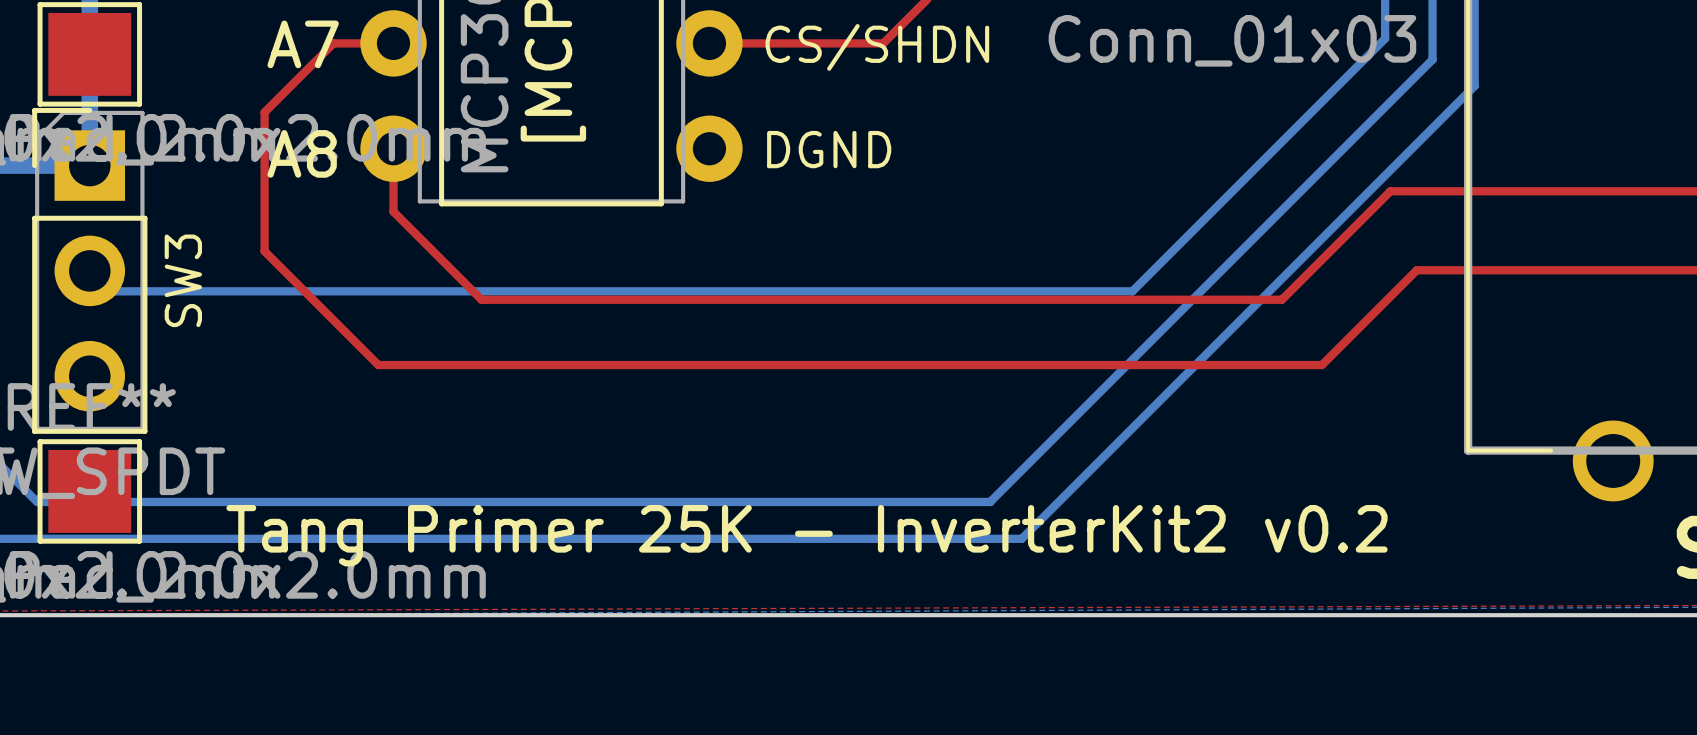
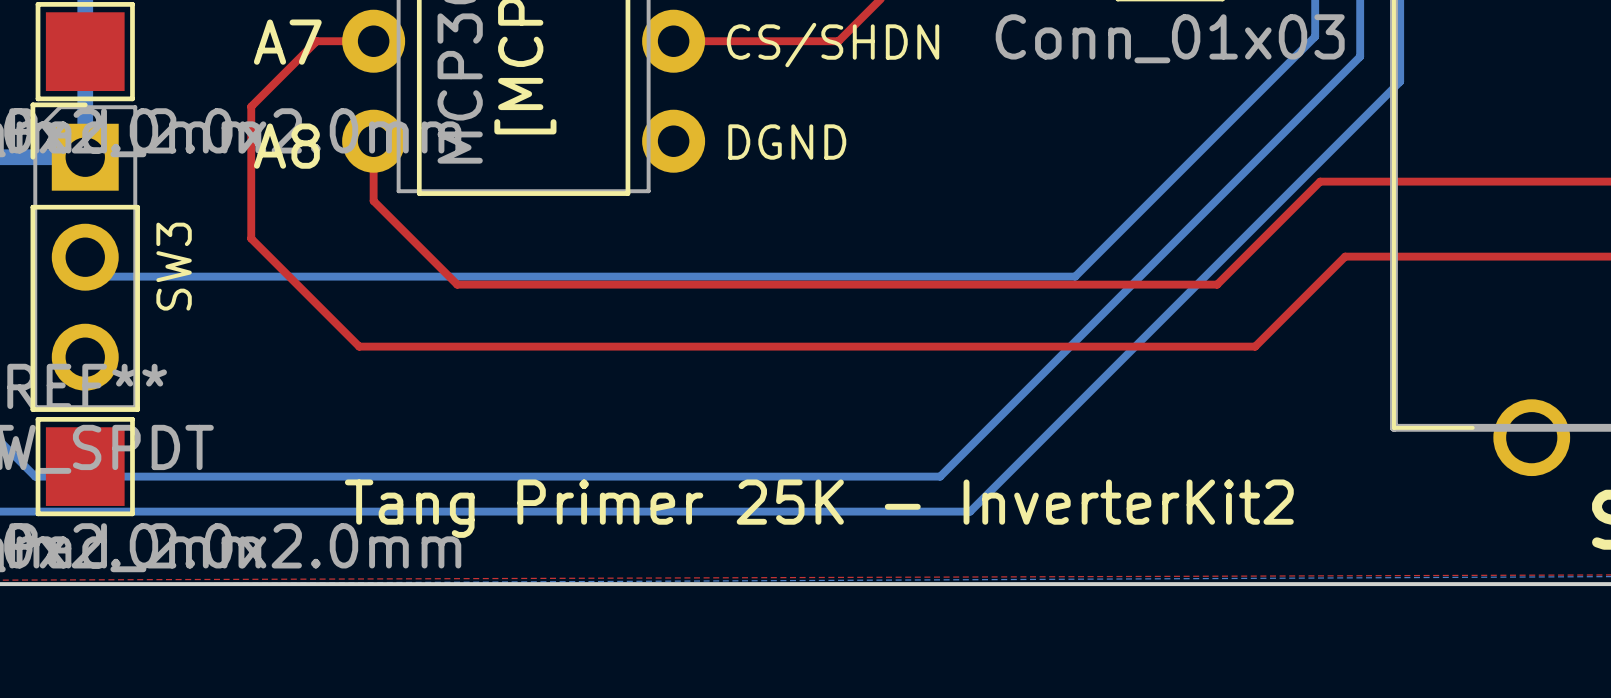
text: Tang Primer 25K - InverterKit2 v0.2 (806, 535) -> Tang Primer 25K - InverterKit2 (819, 508)

